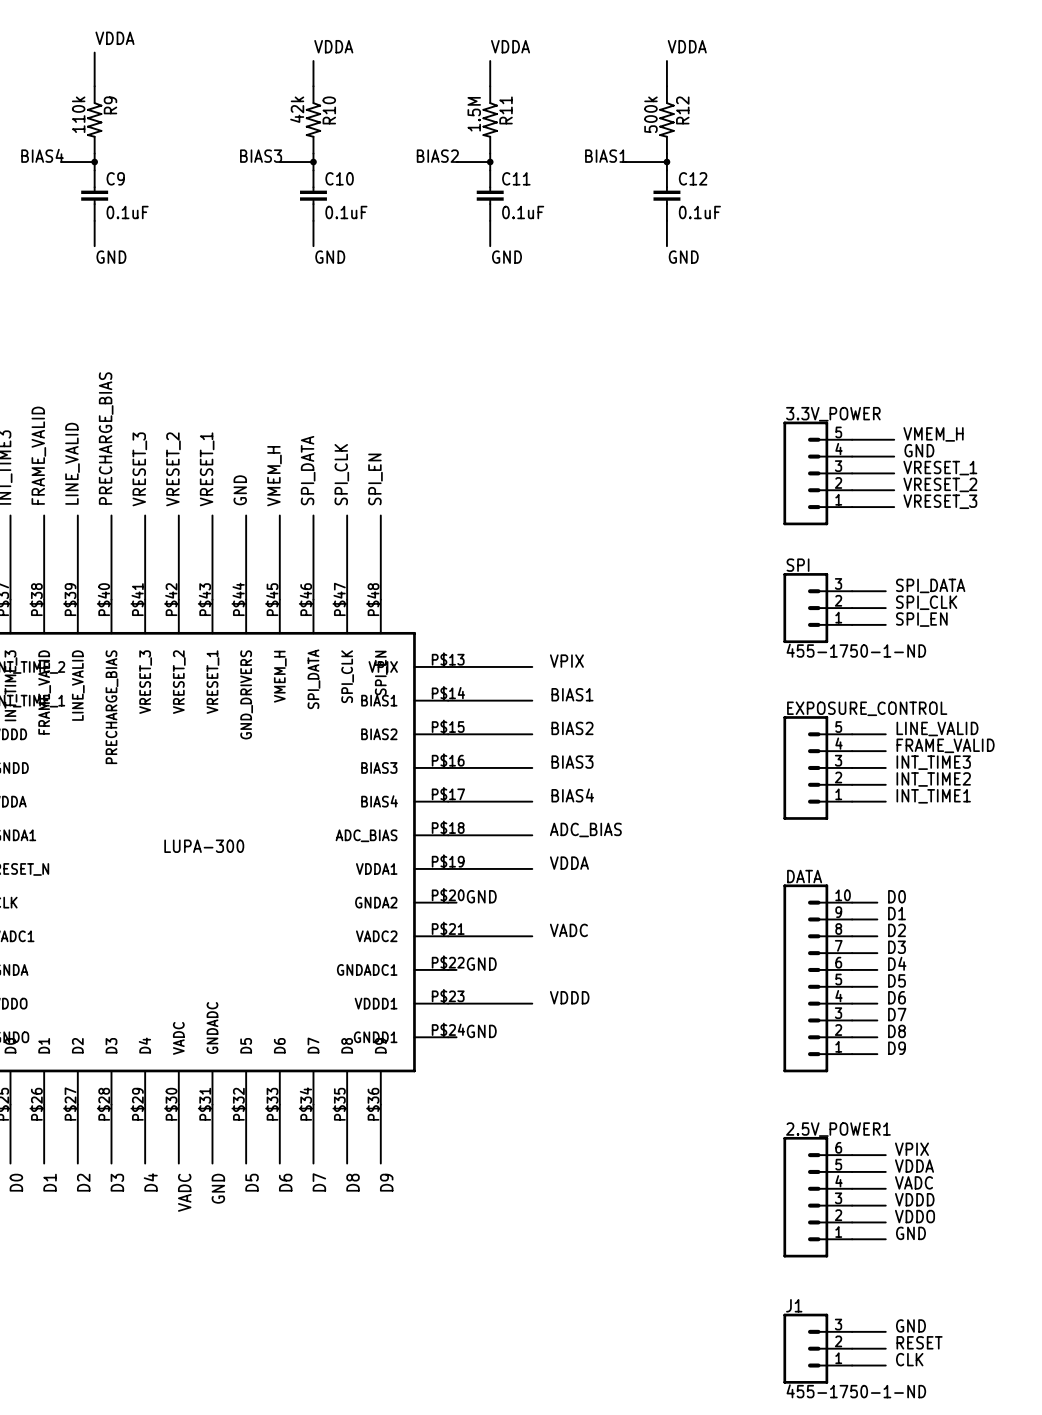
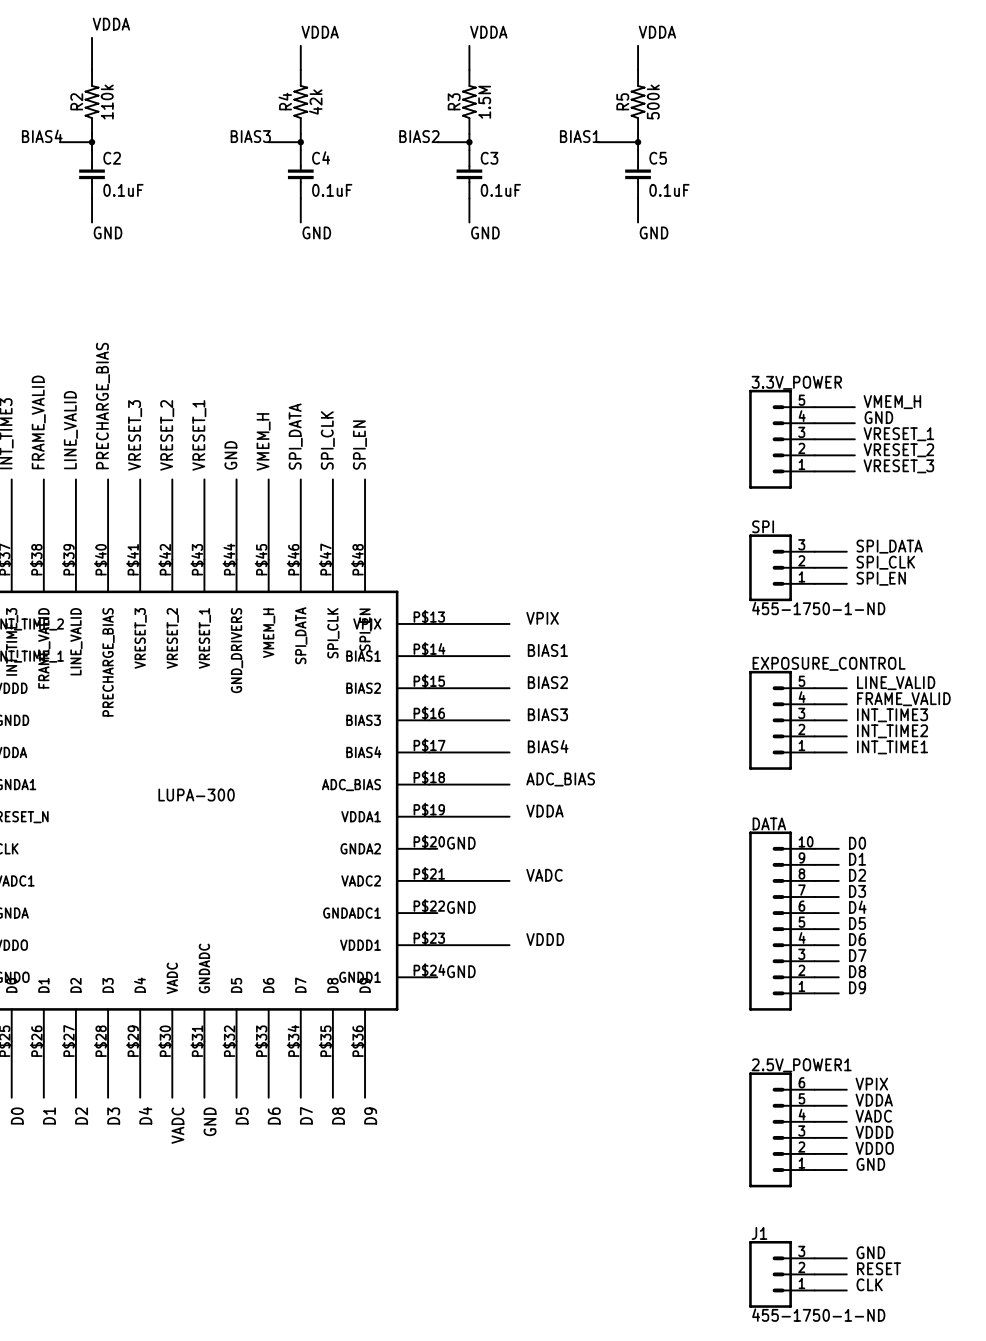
R9: 110k (94, 119) -> none
R2: none -> 110k (92, 102)
R10: 42k (313, 119) -> none
R4: none -> 42k (300, 102)
R11: 1.5M (490, 119) -> none
R3: none -> 1.5M (469, 102)
R12: 500k (666, 119) -> none
R5: none -> 500k (638, 102)
C9 name: C9 (115, 178) -> C2 (112, 158)
C10 name: C10 (339, 178) -> C4 (321, 157)
C11 name: C11 (516, 178) -> C3 (489, 158)
C12 name: C12 (693, 178) -> C5 (658, 158)

